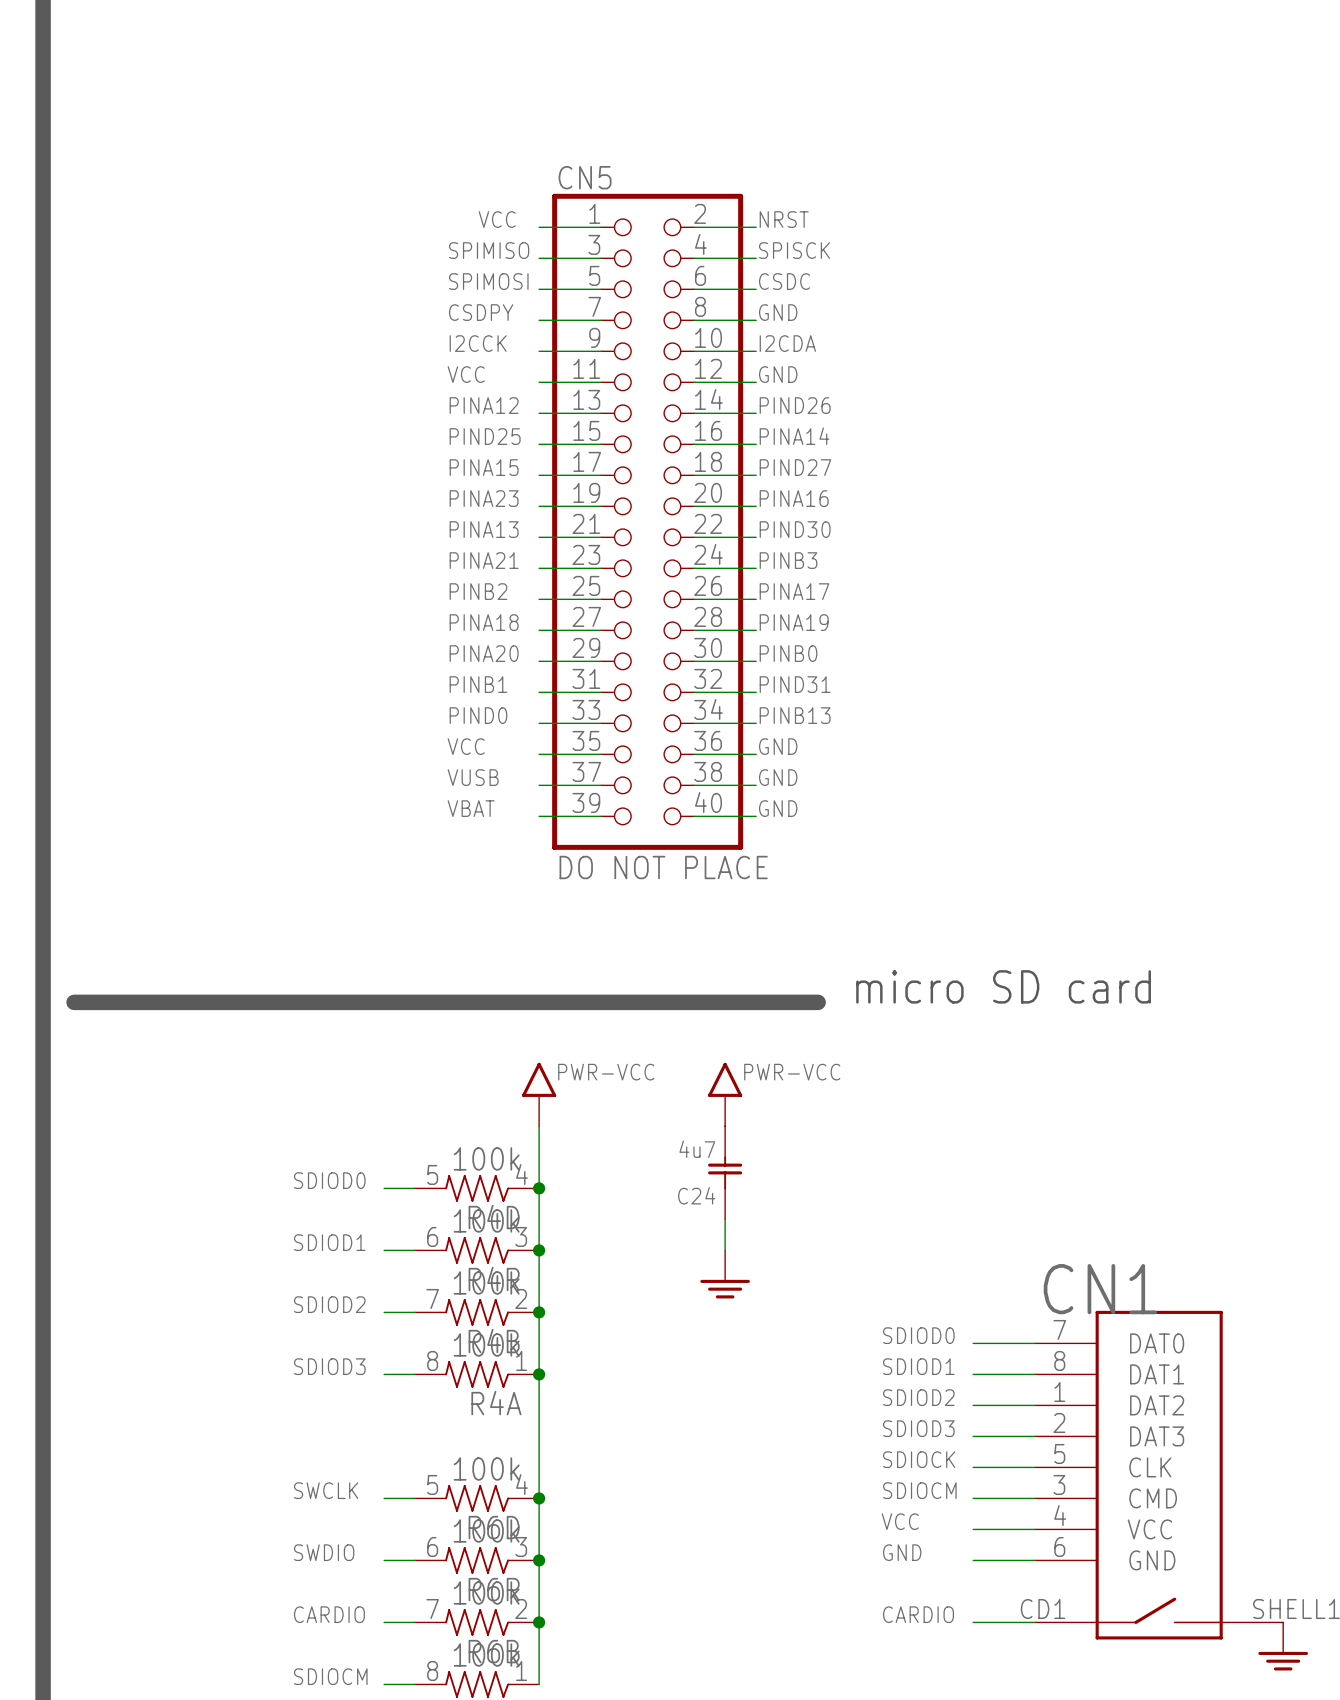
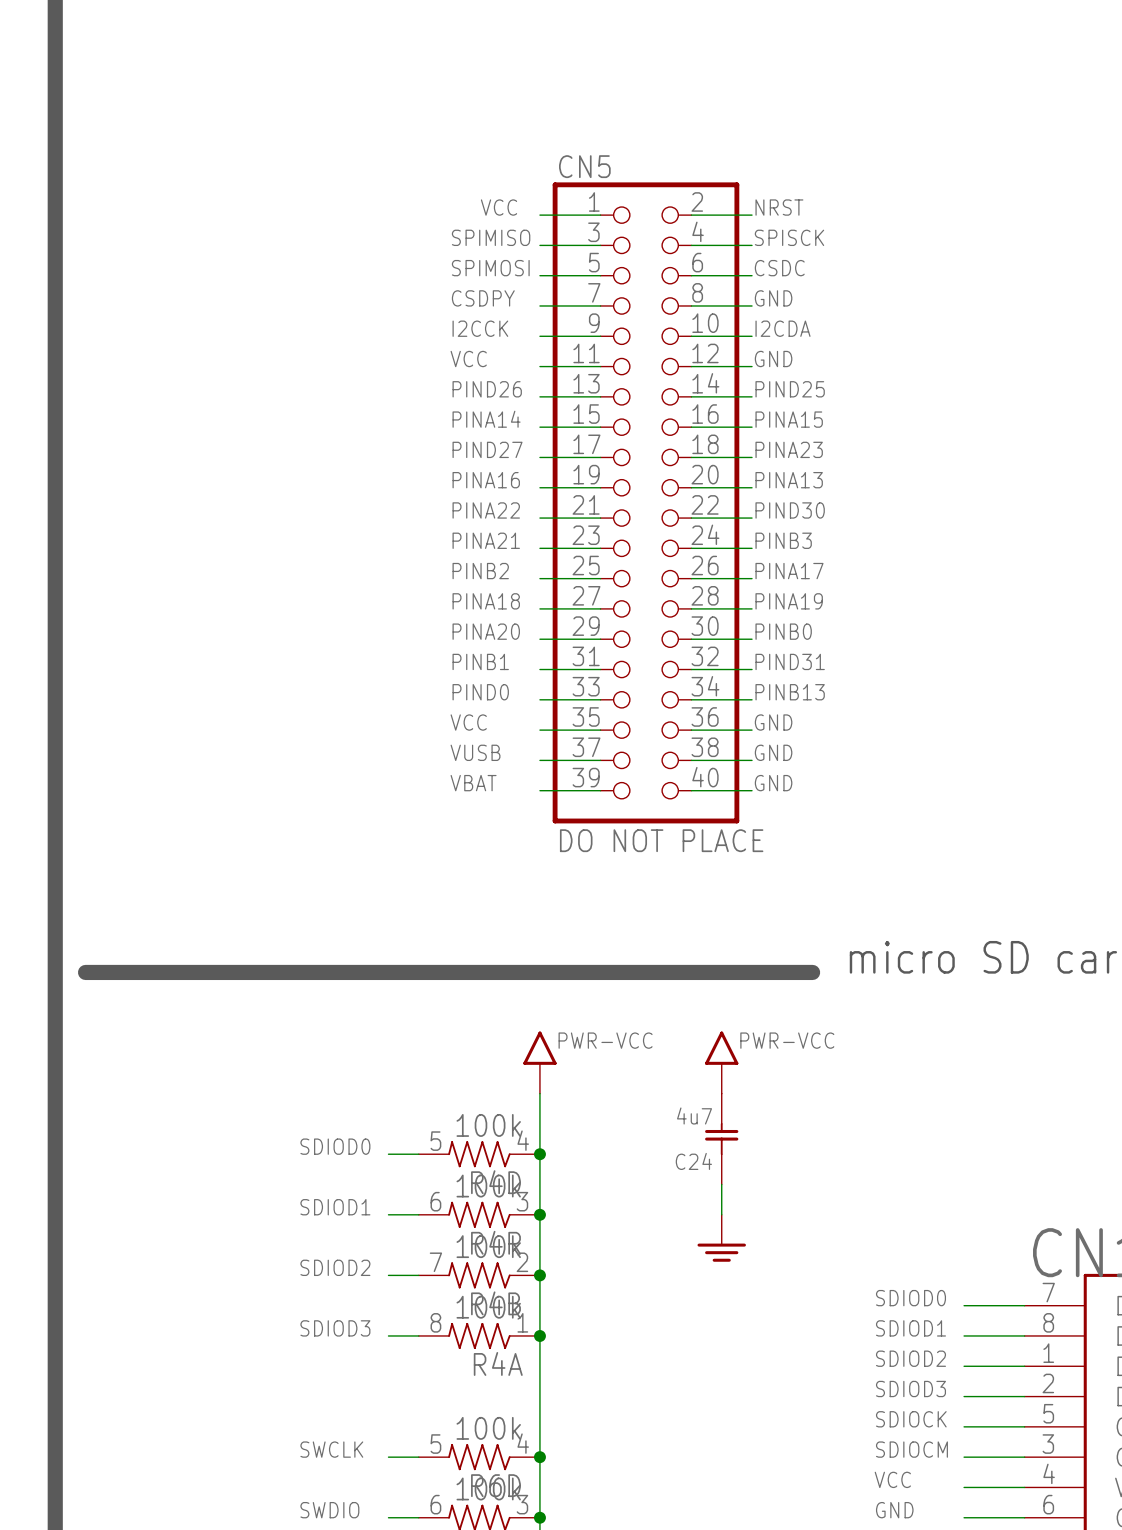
label: PINA12 (484, 405) -> PIND26 (487, 389)
label: PIND26 (795, 405) -> PIND25 (790, 389)
label: PIND25 (485, 436) -> PINA14 (486, 419)
label: PINA14 (794, 436) -> PINA15 (789, 419)
label: PINA15 (484, 467) -> PIND27 (487, 449)
label: PIND27 (795, 467) -> PINA23 (789, 449)
label: PINA23 (484, 498) -> PINA16 (486, 480)
label: PINA16 (794, 498) -> PINA13 (789, 480)
label: PINA13 (484, 529) -> PINA22 (486, 510)

